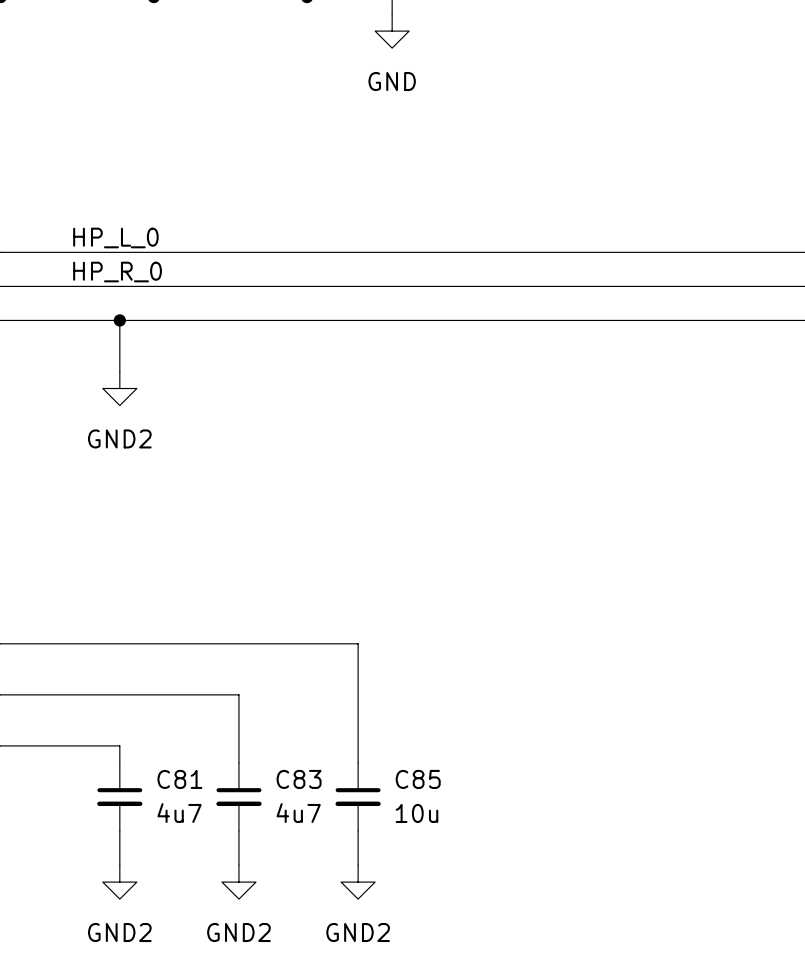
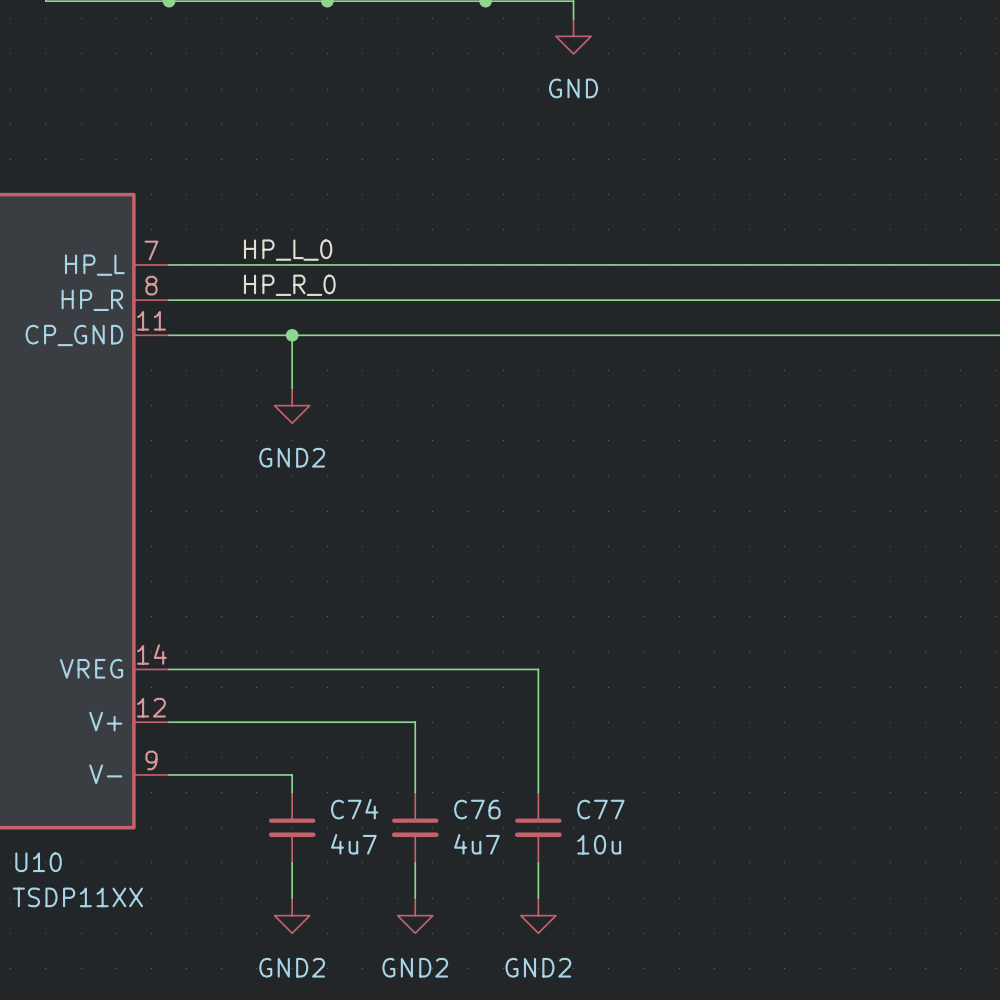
C81 name: C81 (179, 779) -> C74 (354, 809)
C83 name: C83 (299, 779) -> C76 (477, 809)
C85 name: C85 (418, 779) -> C77 (600, 809)

